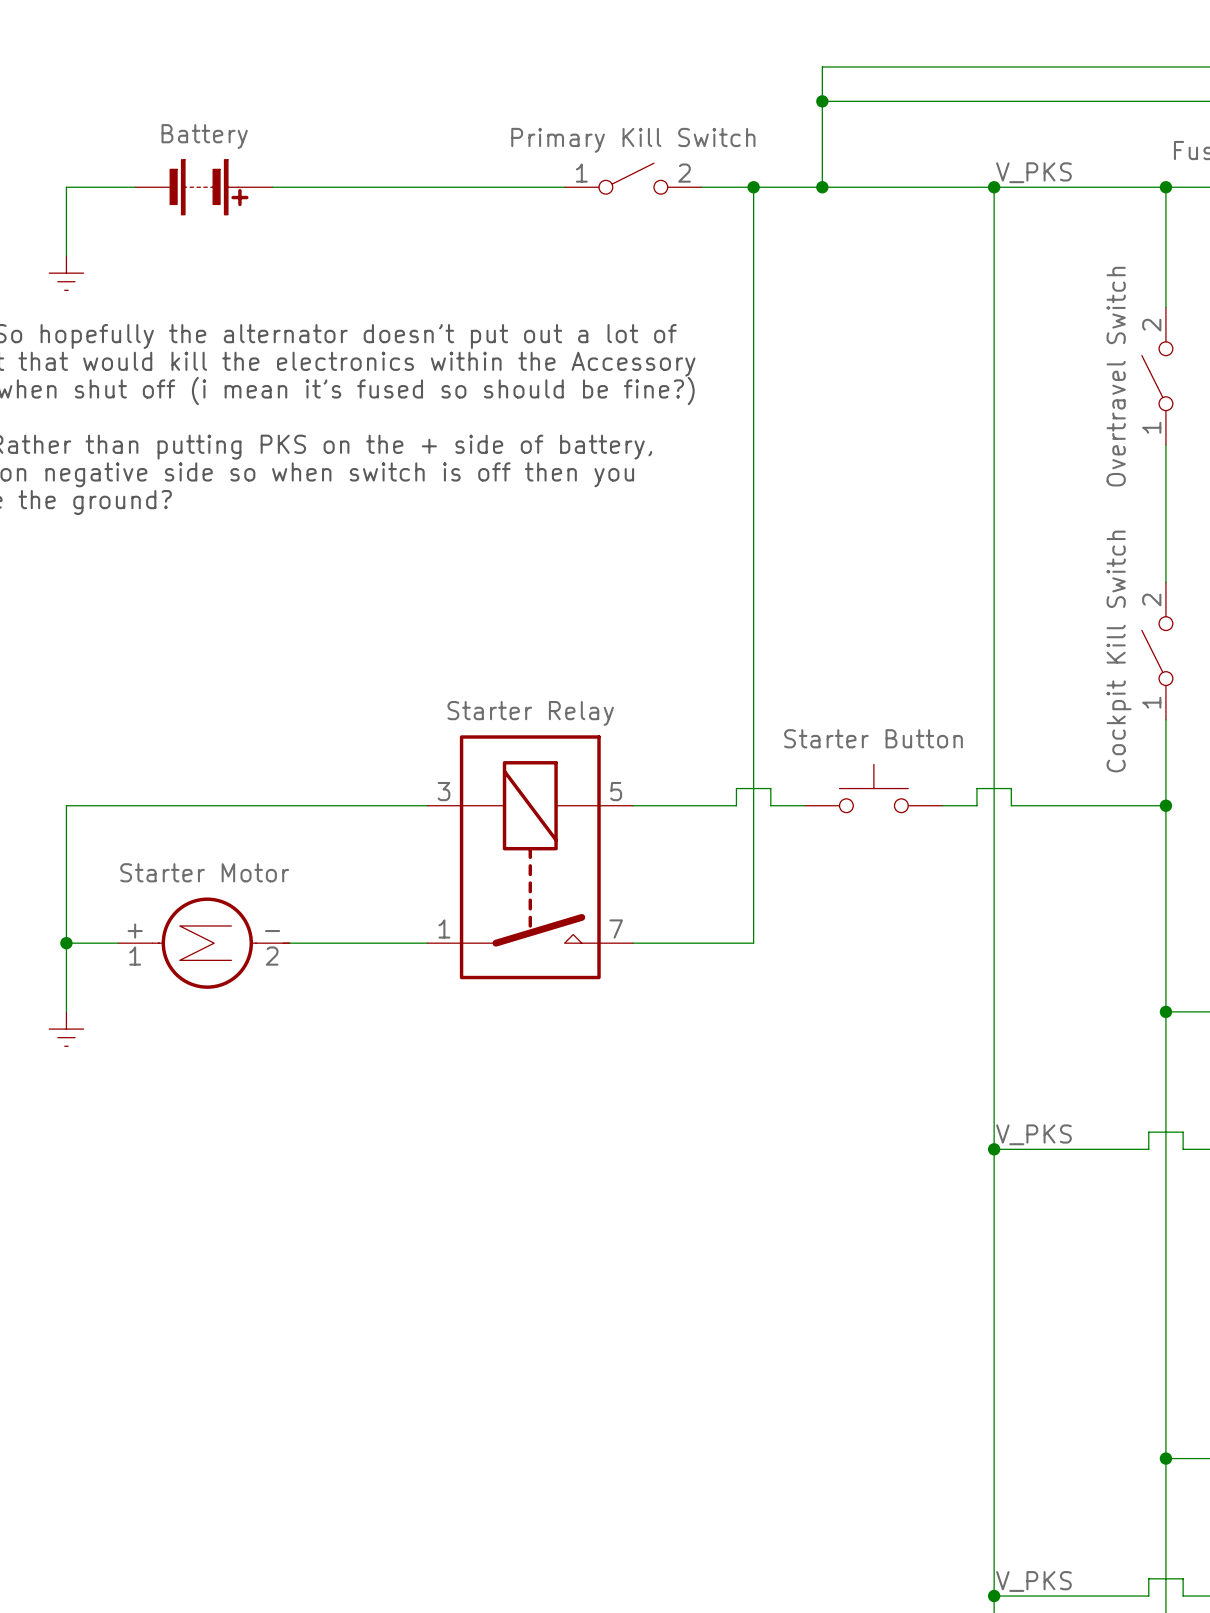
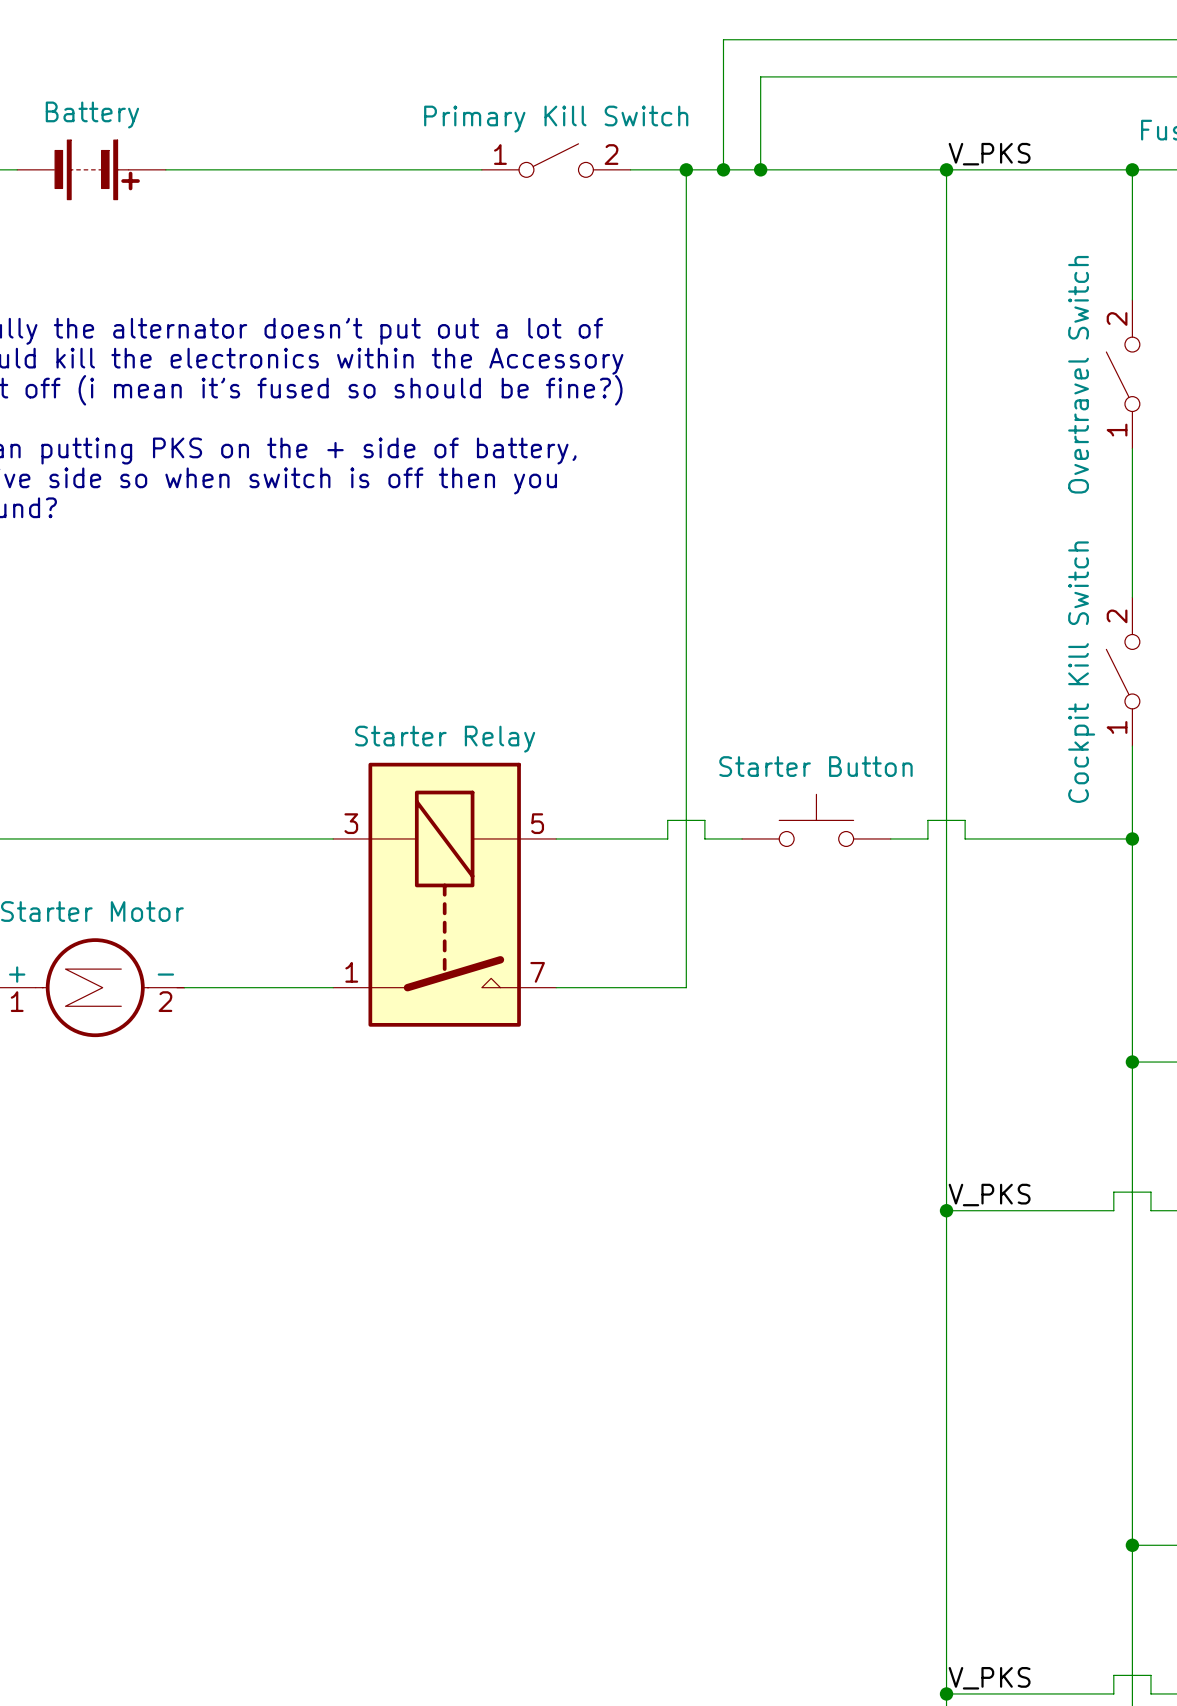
wire: (822, 66) (822, 101) -> (760, 39) (723, 39) (723, 169)
junction: (822, 101) -> none
junction: none -> (723, 169)

